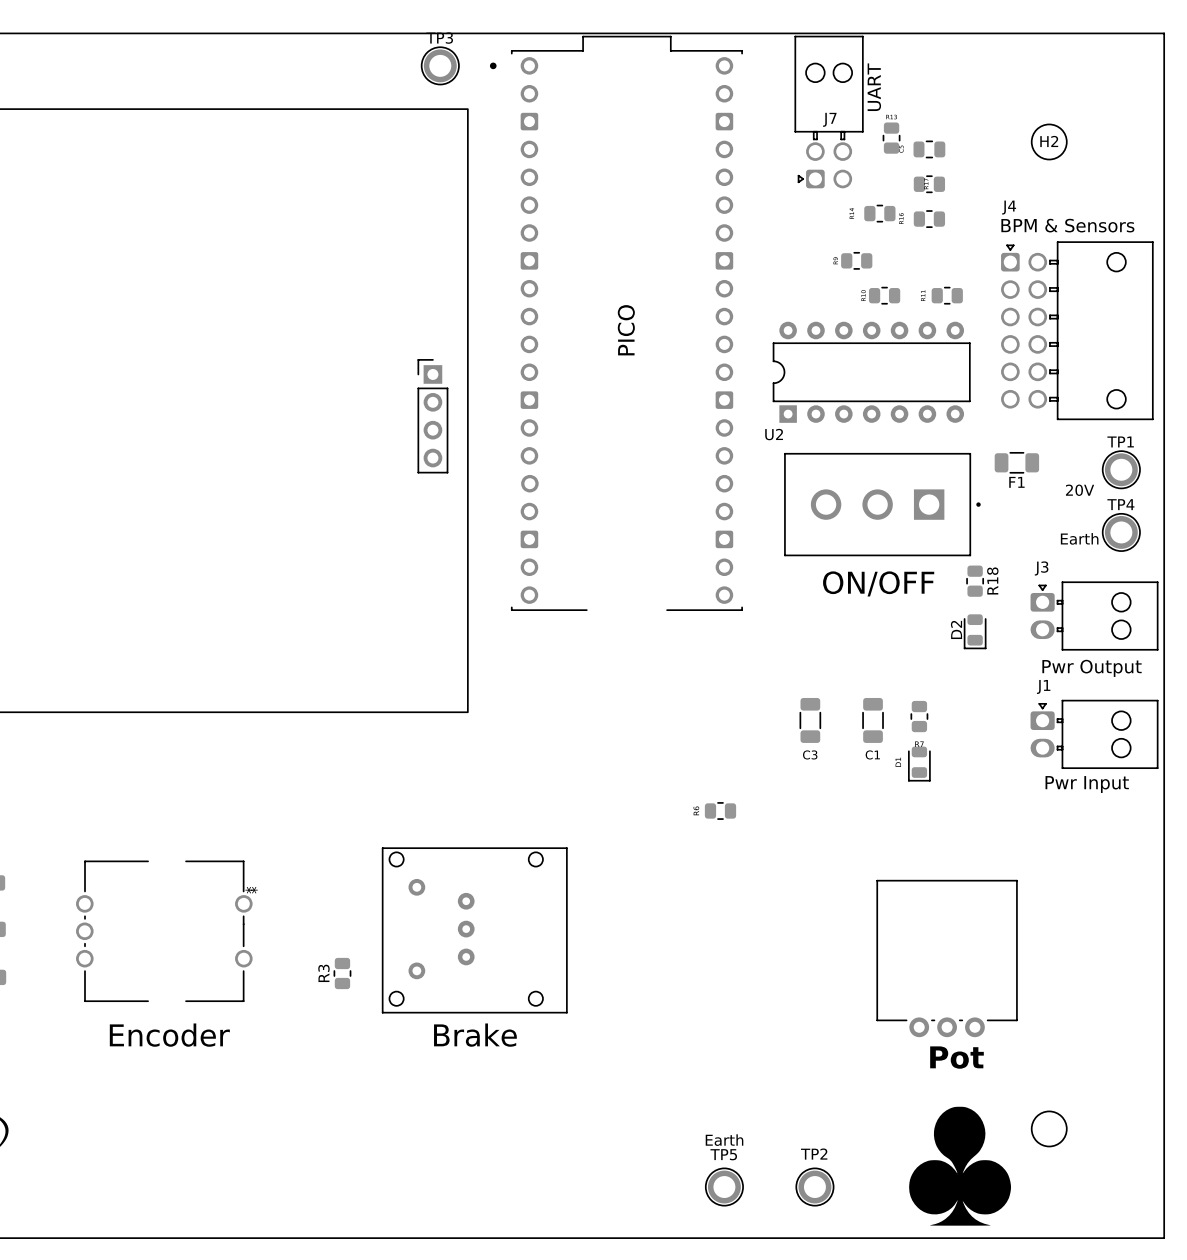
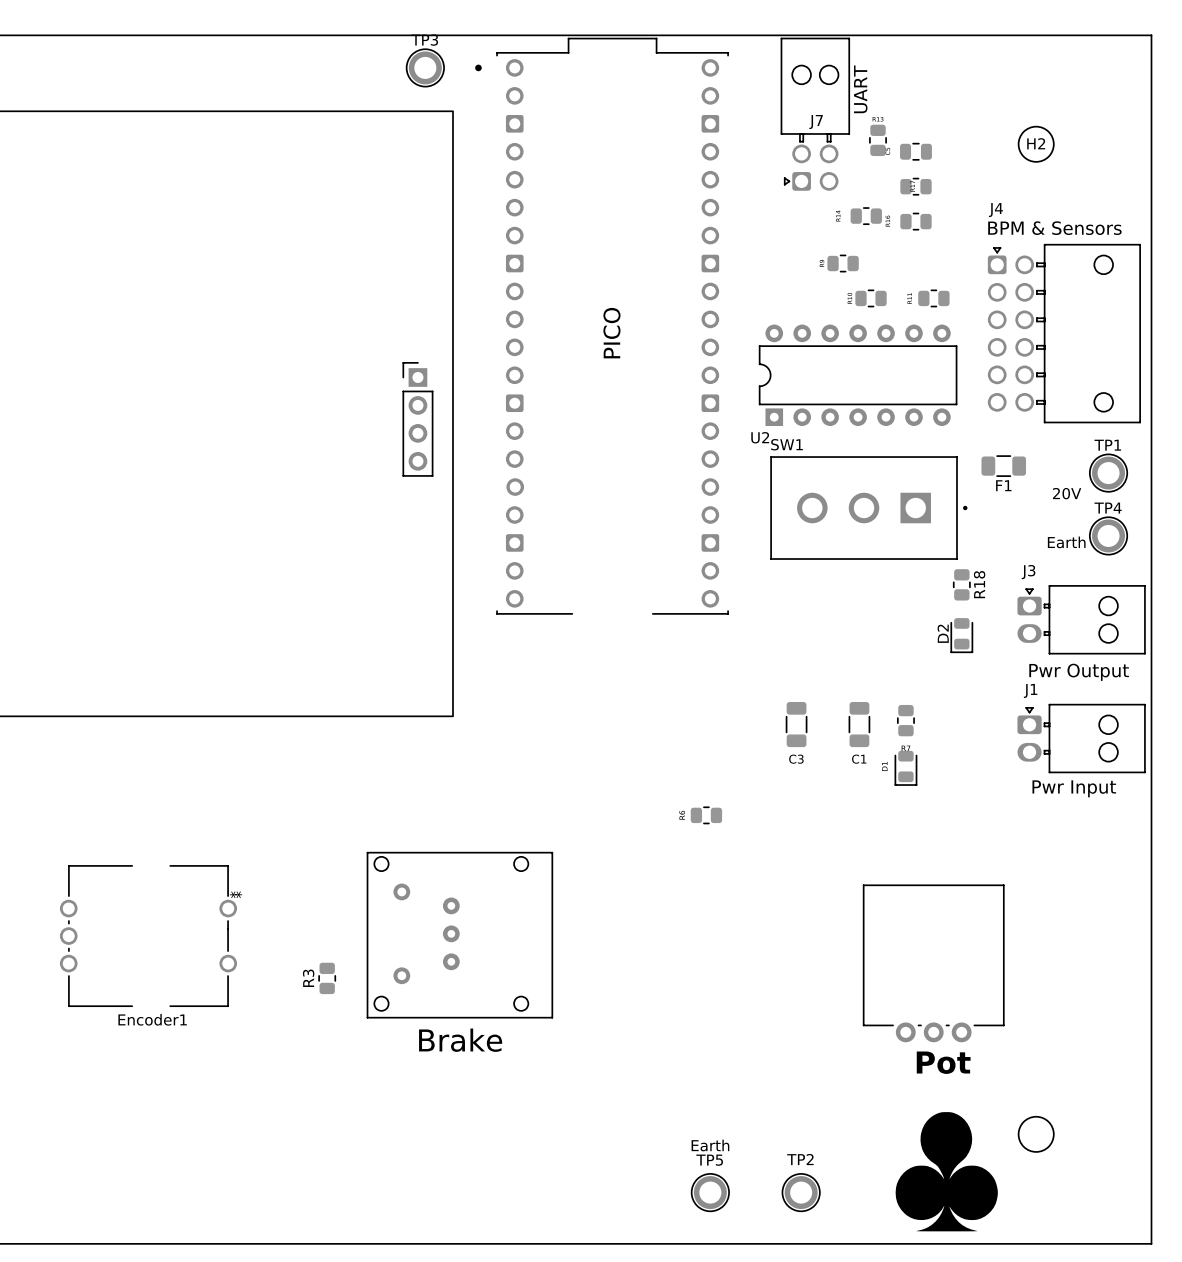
ON/OFF name: ON/OFF (878, 583) -> SW1 (787, 444)
Encoder name: Encoder (169, 1035) -> Encoder1 (152, 1019)

